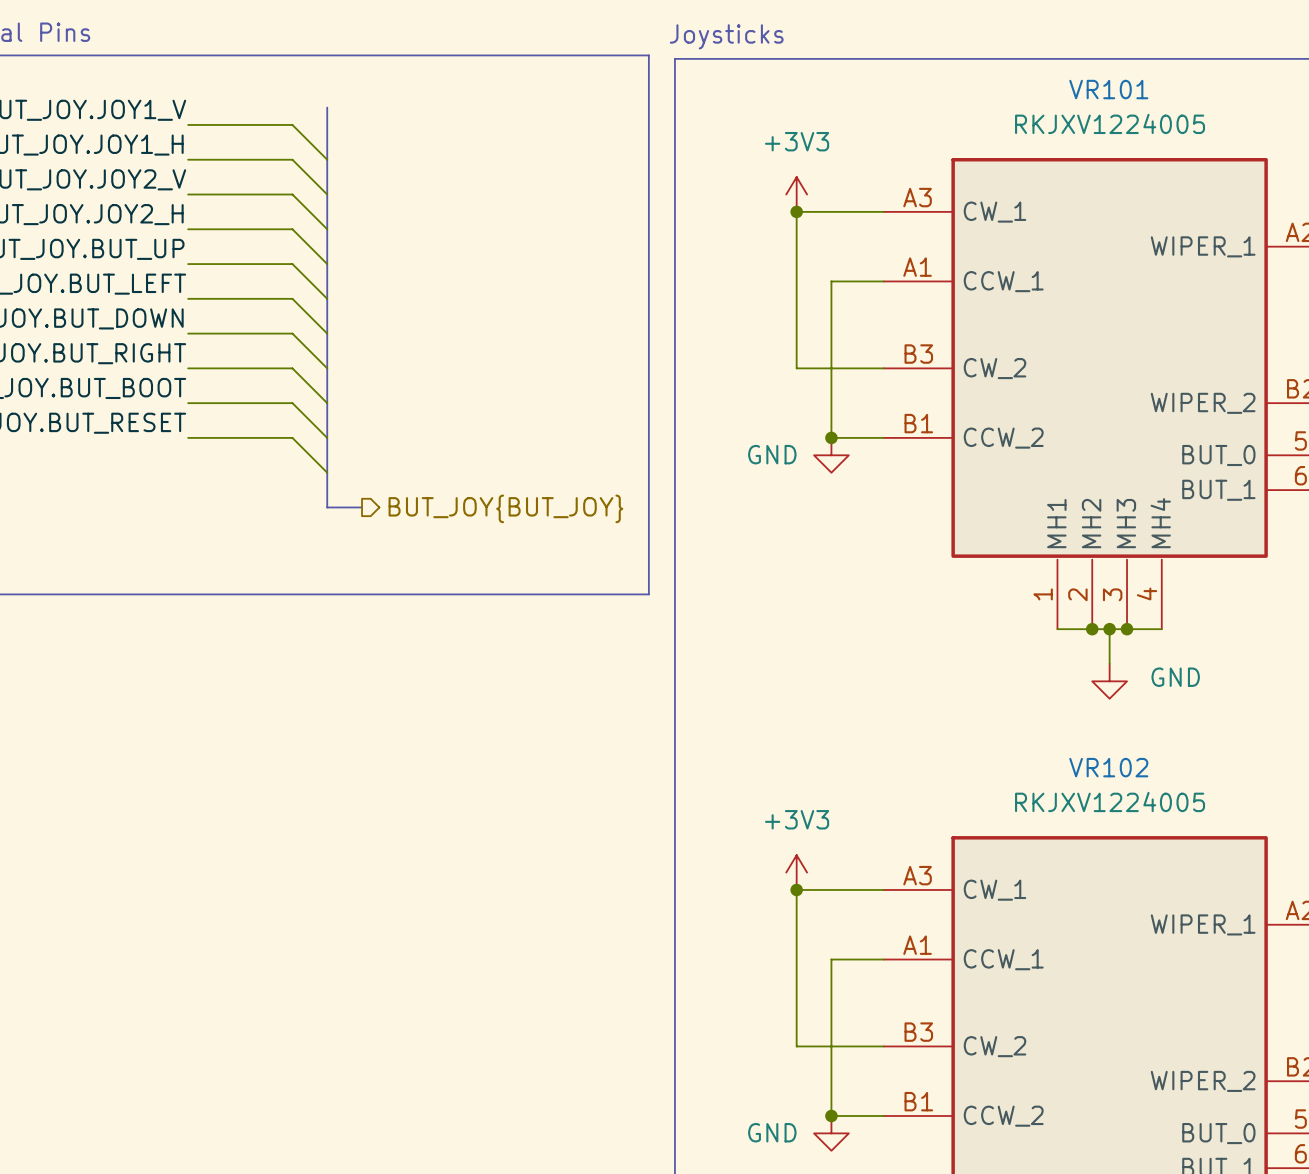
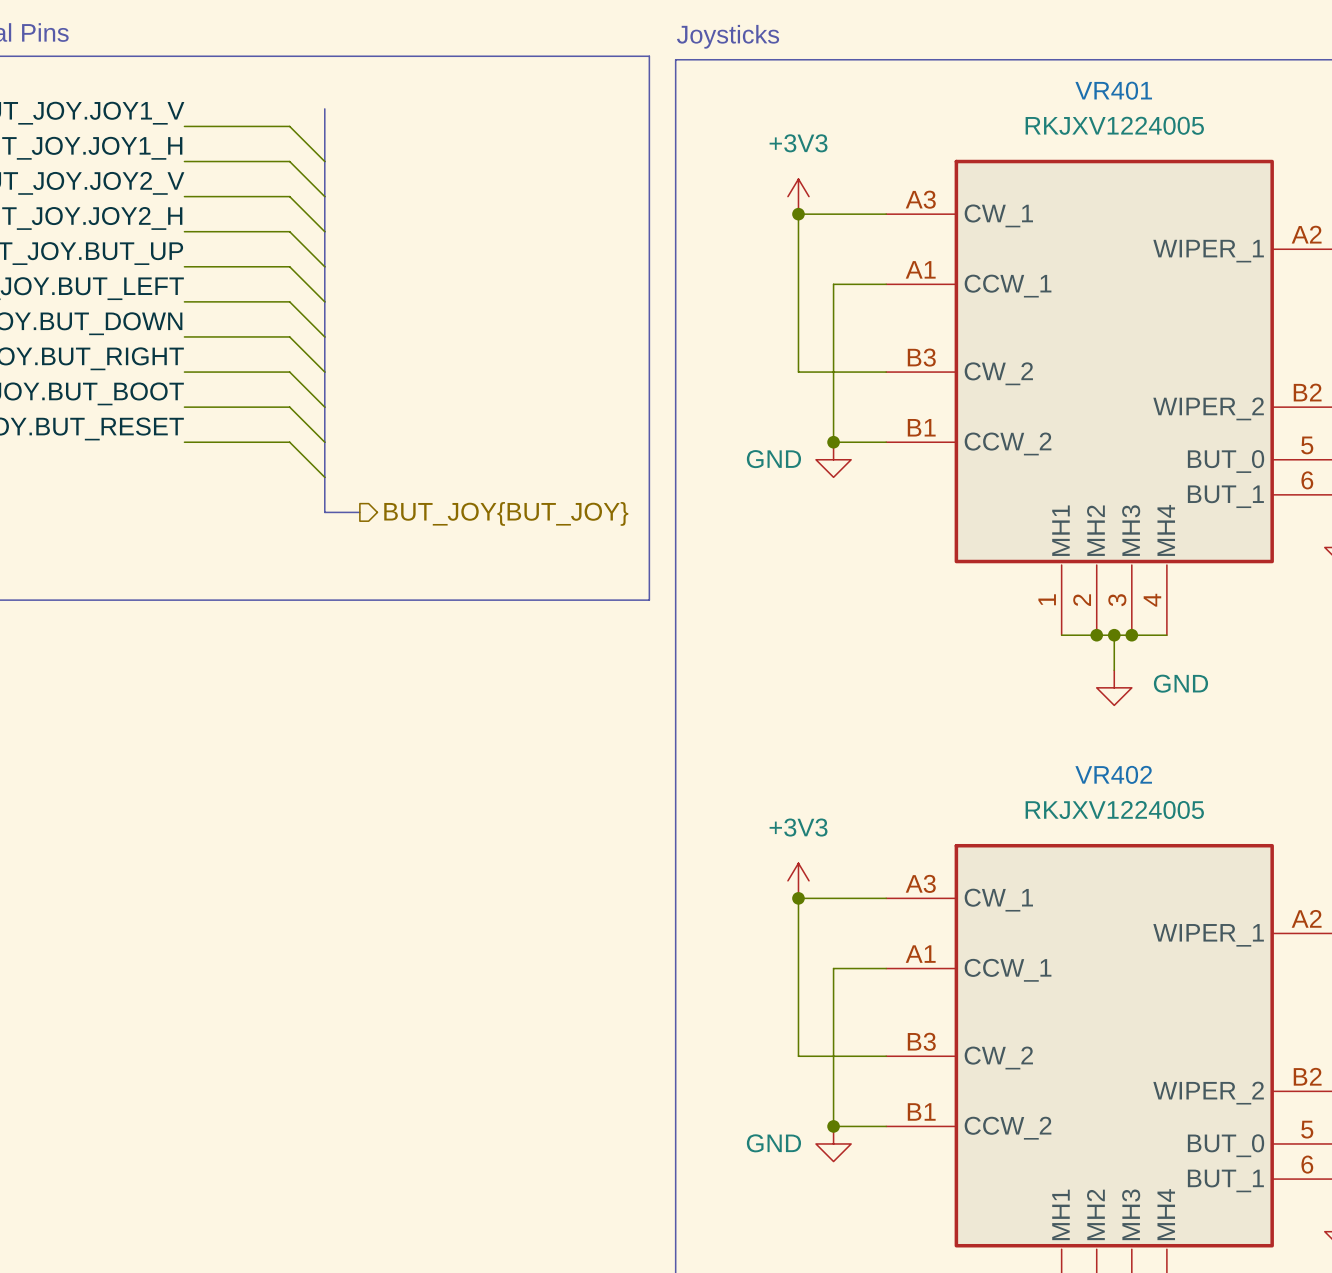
VR101 name: VR101 (1108, 89) -> VR401 (1113, 90)
VR102 name: VR102 (1108, 767) -> VR402 (1113, 774)

